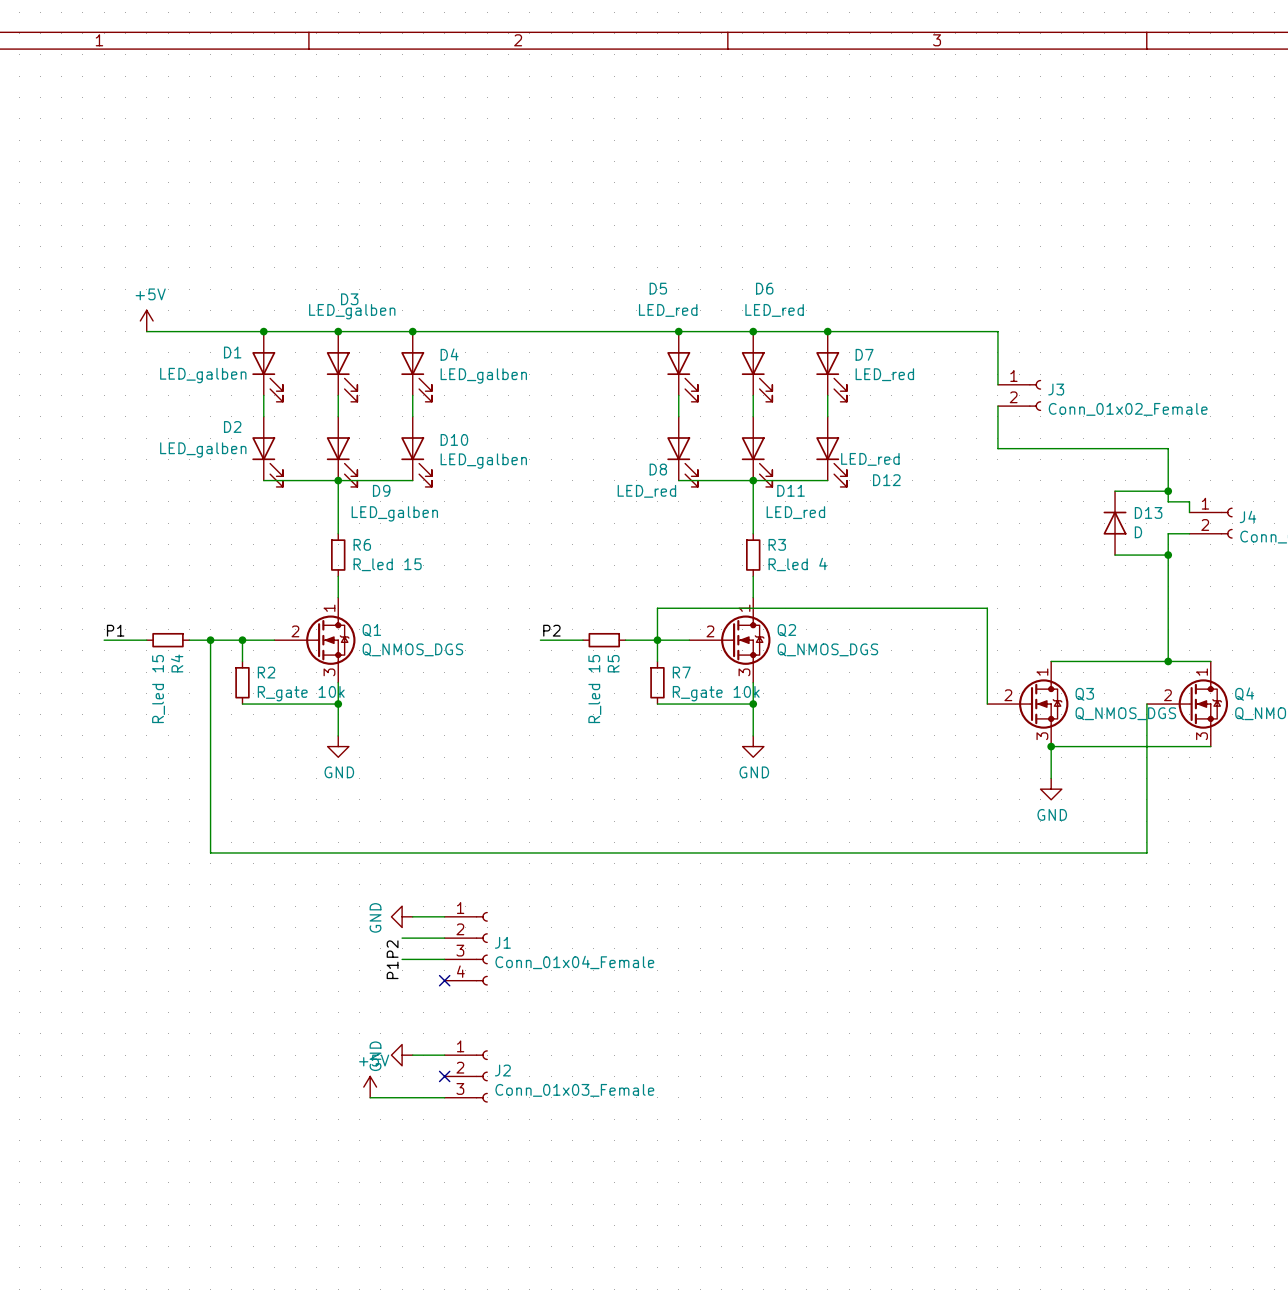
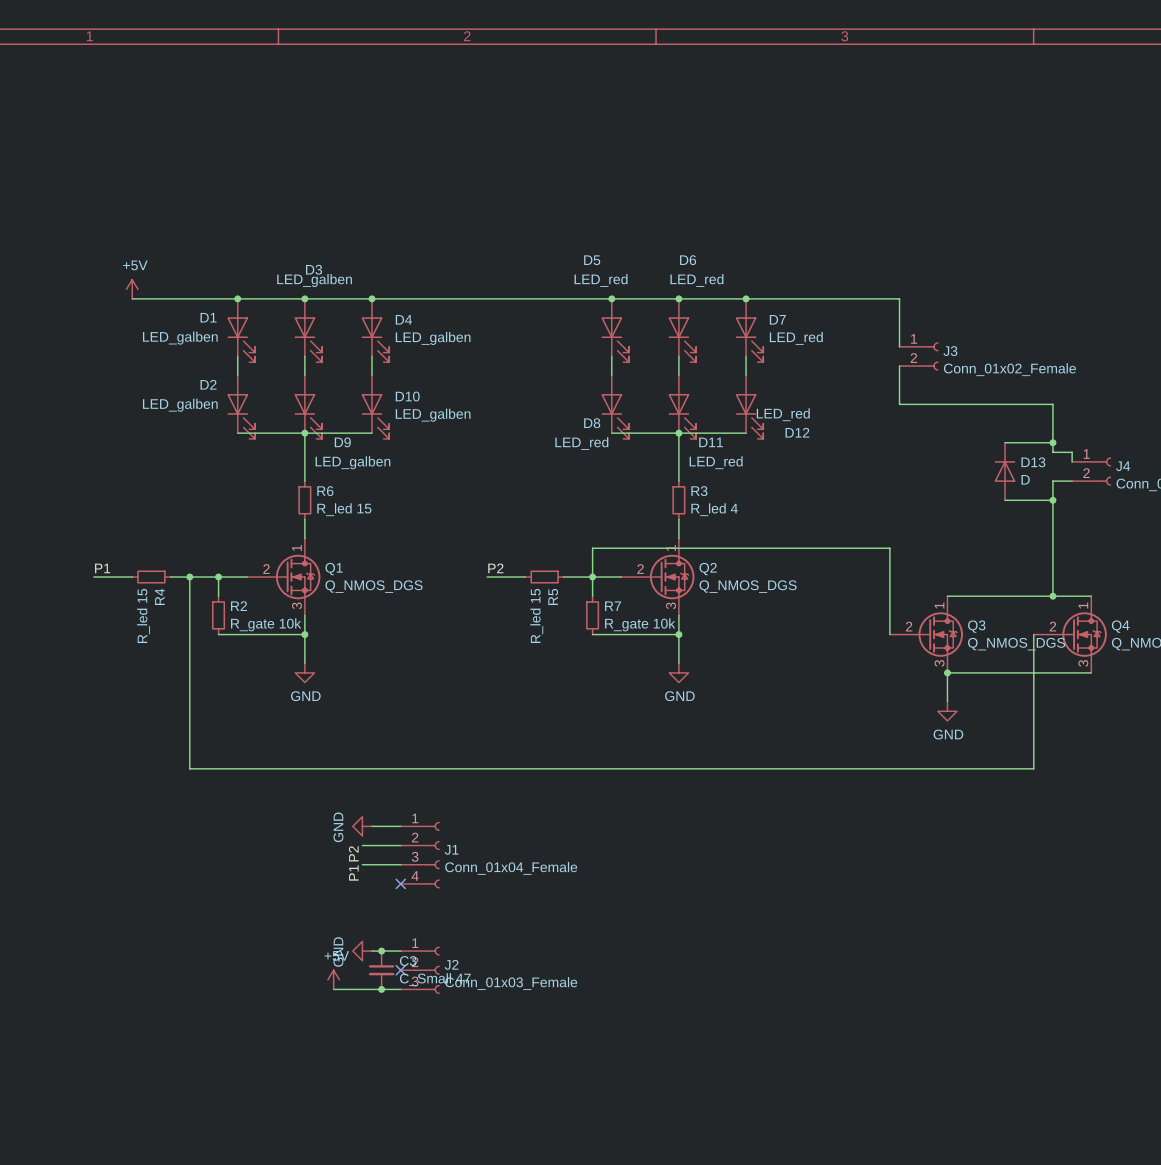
junction: none -> (381, 951)
C3: none -> C_Small 47 (381, 970)
junction: none -> (381, 989)

